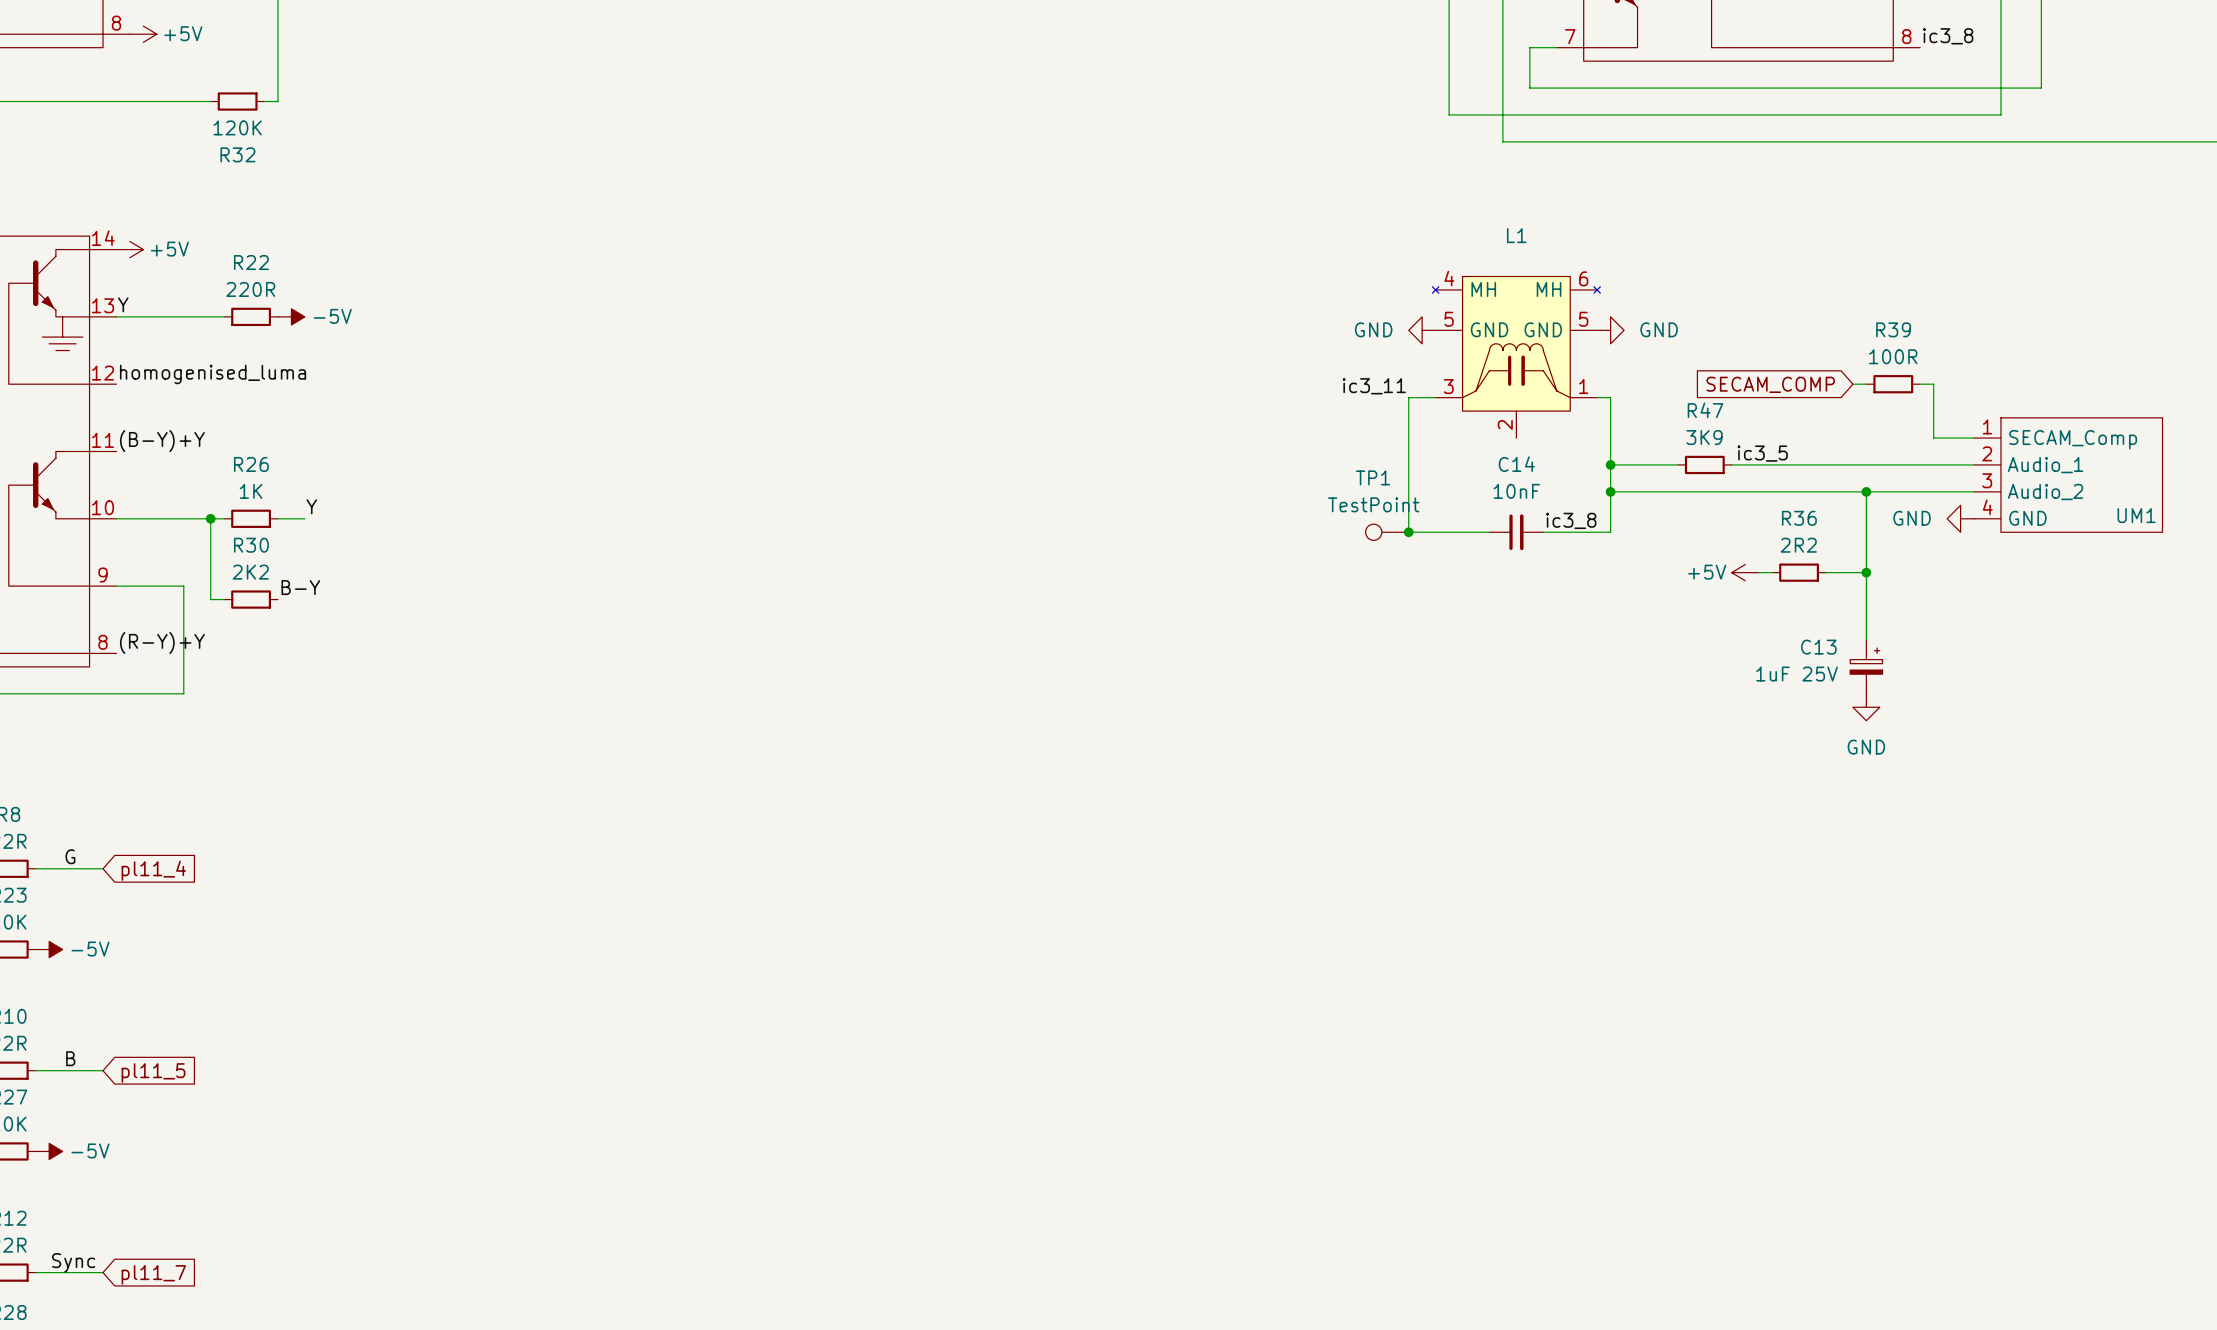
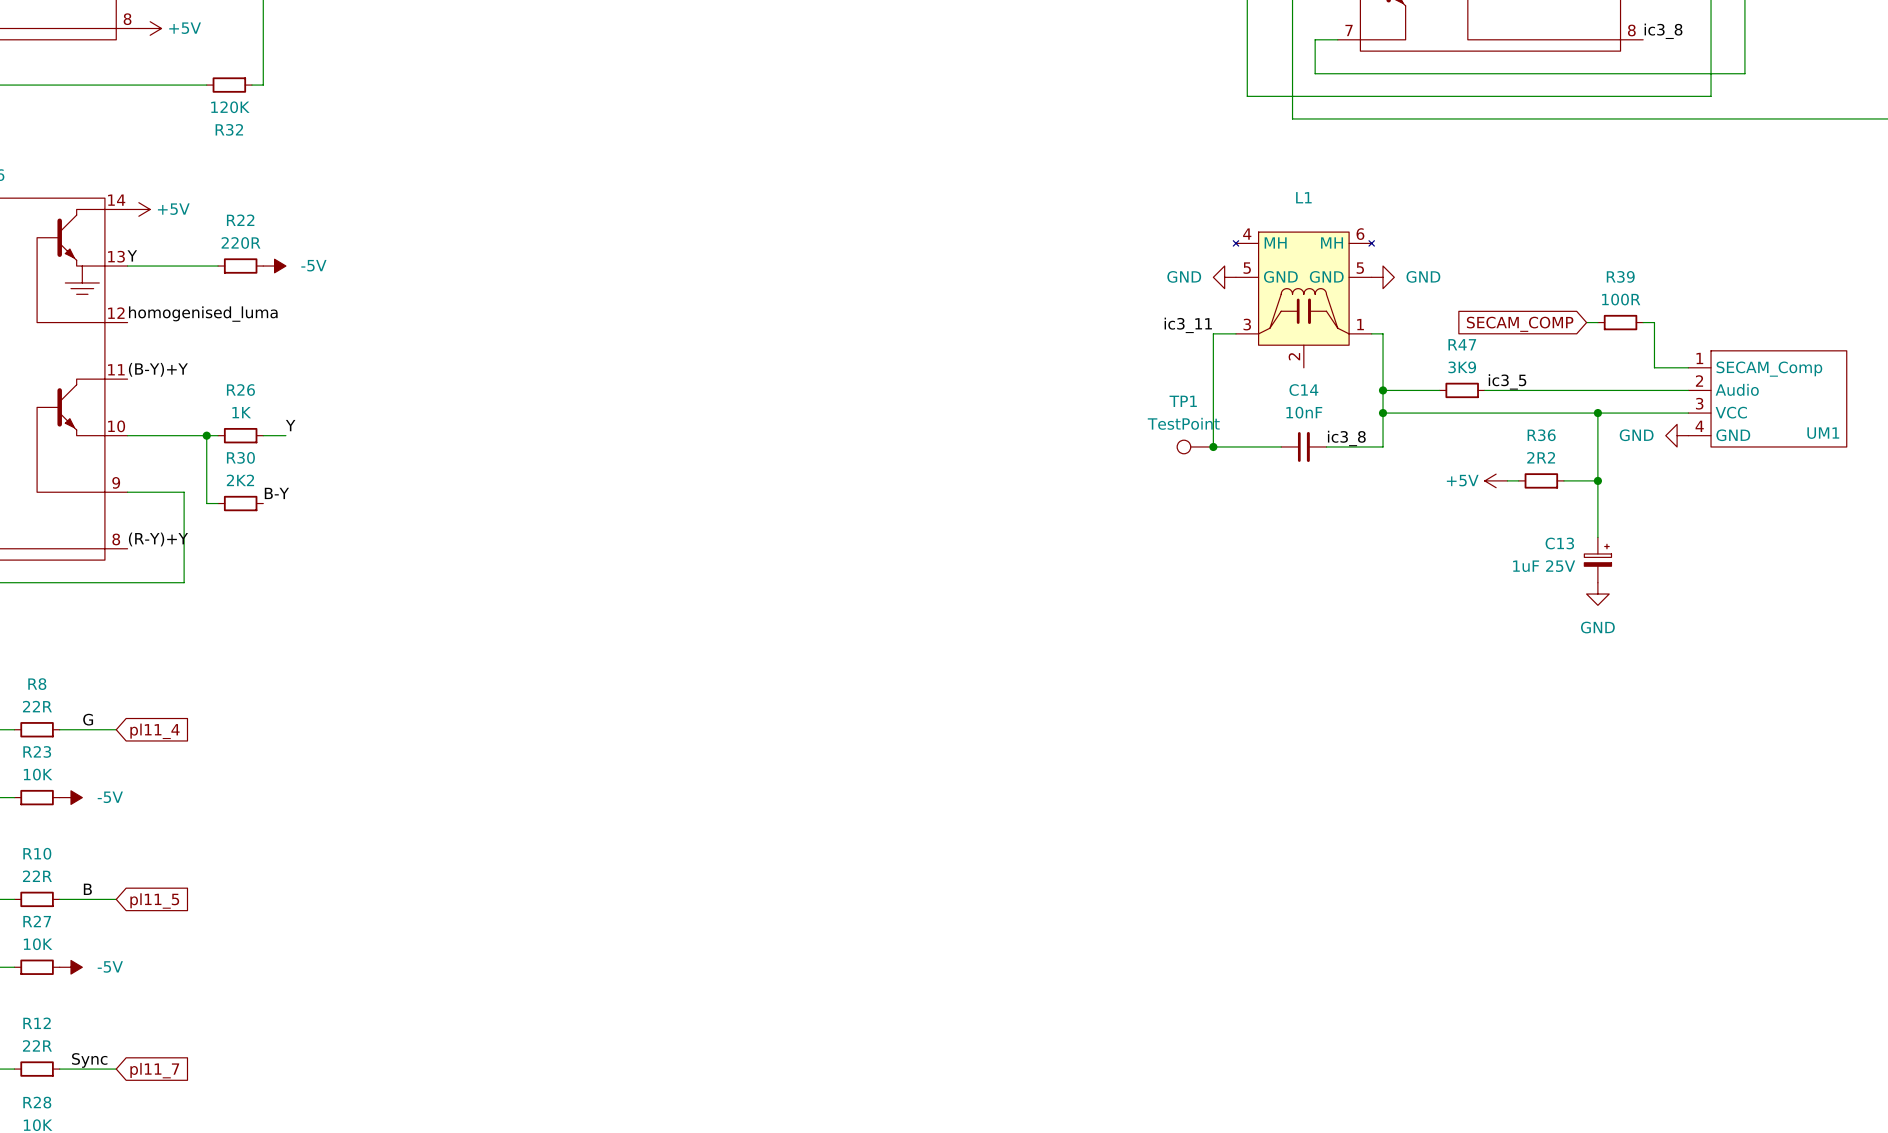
UM1 pin name: Audio_1 (2045, 465) -> Audio (1737, 389)
UM1 pin name: Audio_2 (2045, 492) -> VCC (1731, 412)

